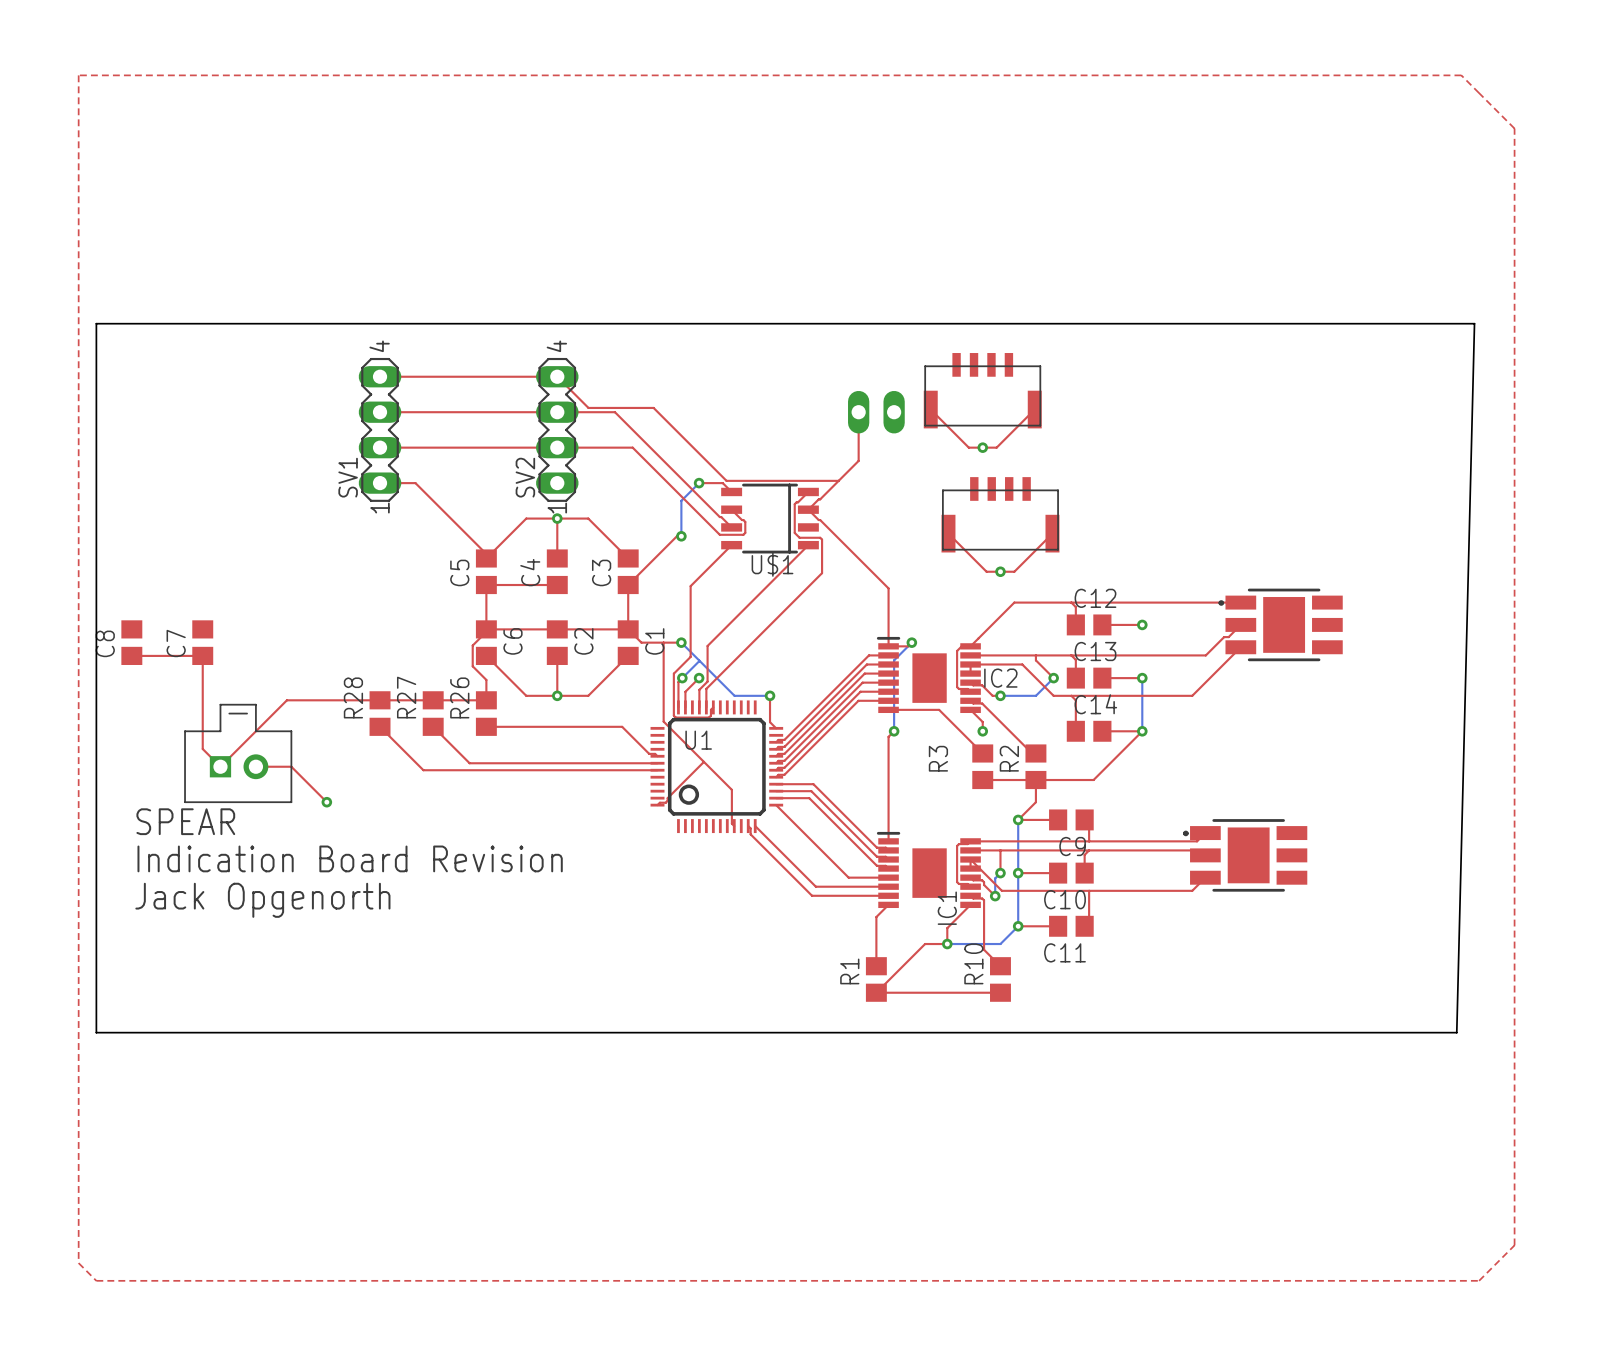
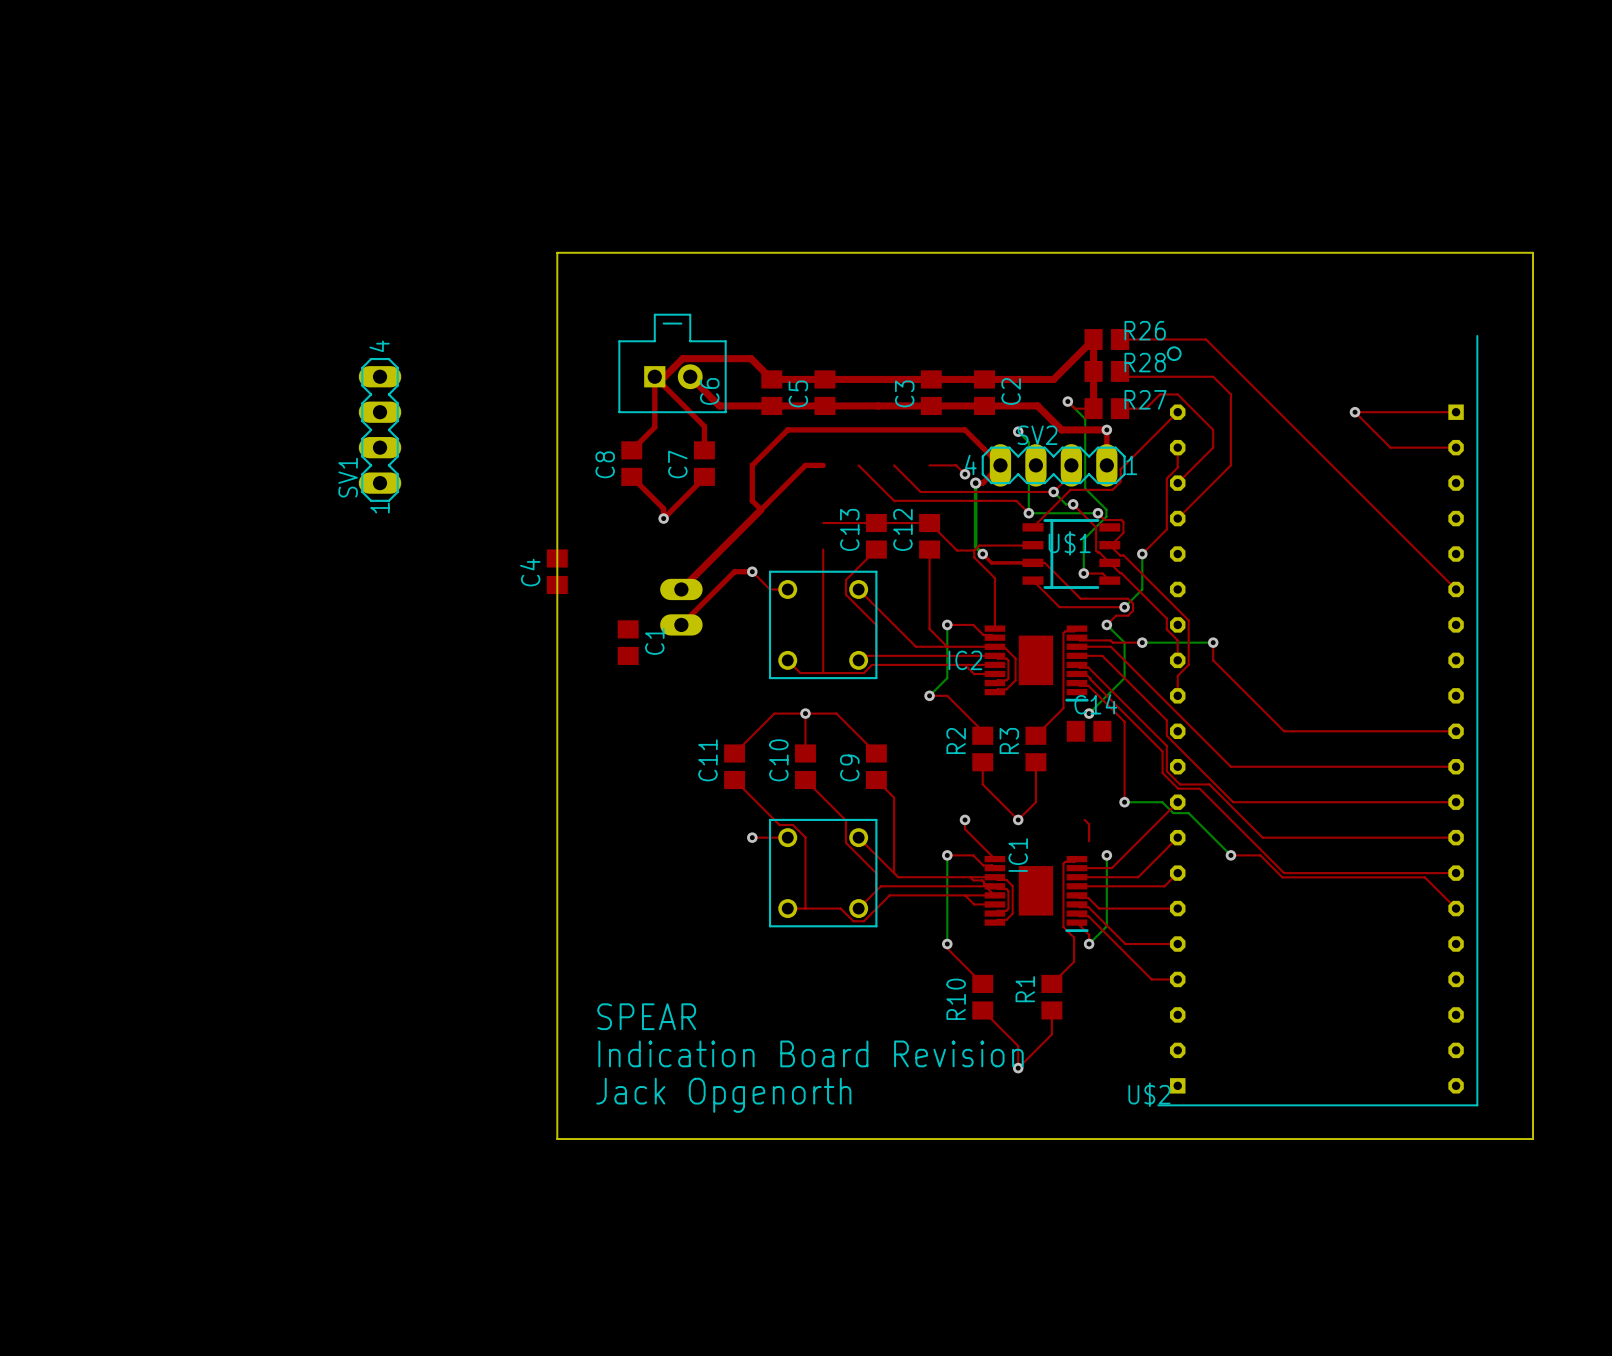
top zone outline: (78, 75) (78, 1263) (96, 1280) (1479, 1280) (1514, 1245) (1514, 128) (1461, 75) (78, 75) -> none
board edge: (96, 323) (1474, 323) (1456, 1032) (96, 1032) (96, 323) -> (557, 252) (557, 1139) (1533, 1139) (1533, 252) (557, 252)
top track: none -> (1120, 339) (1206, 339) (1456, 589)
SV2 footprint: [536, 357, 579, 502] -> [981, 444, 1126, 487]
part: none -> (672, 363)
top track: none -> (1120, 371) (1125, 376) (1213, 376) (1230, 394) (1230, 465) (1177, 518)
top track: (380, 376) (557, 376) (588, 407) (653, 407) (726, 480) (838, 480) -> none
top track: none -> (654, 376) (664, 376) (682, 358) (751, 358) (771, 379) (1053, 379) (1093, 339) (1093, 408) (1074, 408) (1067, 401)
top track: none -> (654, 376) (654, 427) (631, 450)
top track: none -> (654, 376) (704, 426) (704, 450)
top track: none -> (690, 376) (719, 405) (1037, 405) (1061, 429) (1106, 429) (1106, 465)
part: (982, 390) -> none
bottom track: none -> (1067, 401) (1085, 418) (1085, 488) (1106, 509) (1106, 516) (1083, 539) (1083, 573)
via: none -> (1067, 401)
top track: none -> (1120, 408) (1145, 408) (1160, 394) (1177, 394) (1213, 429) (1213, 447) (1177, 483)
top track: (930, 409) (968, 447) (996, 447) (1034, 409) -> none
top track: (380, 412) (614, 412) (731, 527) -> none
top track: (858, 412) (858, 460) (808, 509) (888, 588) (888, 646) (908, 646) (911, 642) -> none
part rotation: 0° (876, 412) -> 90° clockwise (681, 607)
part position: (876, 412) -> (681, 607)
top track: none -> (1177, 412) (1120, 469) (1120, 481) (1112, 489) (1070, 489) (1033, 527)
via: none -> (1355, 412)
top track: none -> (1456, 412) (1355, 412) (1390, 447) (1456, 447)
via: none -> (1106, 429)
bottom track: none -> (1018, 431) (1028, 442) (1028, 513) (1097, 513)
via: none -> (1018, 431)
top track: (380, 447) (632, 447) (719, 534) (743, 534) (745, 532) (745, 521) (731, 509) -> none
via: (982, 447) -> none
top track: none -> (1177, 447) (1177, 467) (1166, 478) (1166, 529) (1142, 554)
top track: none -> (823, 465) (805, 465) (761, 509)
top track: none -> (858, 465) (894, 500) (1016, 500) (1028, 513)
top track: none -> (894, 465) (920, 491) (1053, 491) (1071, 474) (1071, 465)
top track: none -> (929, 465) (956, 465) (965, 474)
via: none -> (965, 474)
top track: none -> (631, 476) (663, 508) (663, 518) (704, 477)
SV2 name position: SV2 (525, 477) -> SV2 (1037, 435)
top track: (380, 483) (415, 483) (488, 556) -> none
top track: (699, 483) (722, 483) (731, 491) -> none
bottom track: (699, 483) (681, 500) (681, 536) -> none
via: (699, 483) -> none
top track: none -> (975, 483) (982, 483) (1000, 465) (965, 429) (787, 429) (752, 465) (752, 500) (761, 509)
bottom track: none -> (975, 483) (975, 546) (982, 554)
via: none -> (975, 483)
top track: (808, 491) (794, 504) (794, 532) (799, 537) (820, 537) (822, 539) (822, 573) (706, 688) (706, 707) -> none
bottom track: none -> (1053, 491) (1066, 504) (1073, 504)
via: none -> (1053, 491)
top track: none -> (1073, 504) (1096, 527) (1096, 550) (1166, 618) (1166, 629) (1177, 640) (1177, 660)
via: none -> (1073, 504)
top track: none -> (761, 509) (681, 589)
via: none -> (1028, 513)
top track: none -> (1097, 513) (1104, 520) (1121, 520) (1123, 521) (1123, 532) (1112, 543) (1112, 548)
via: none -> (1097, 513)
part: (1000, 514) -> none
top track: (557, 518) (557, 558) -> (805, 713) (805, 753)
via: (557, 518) -> none
via: none -> (663, 518)
U$1 rotation: 0° (770, 518) -> 180° (1071, 554)
U$1 position: (770, 518) -> (1071, 554)
top track: none -> (823, 523) (929, 523) (957, 550) (974, 550)
top track: (948, 533) (986, 571) (1014, 571) (1052, 533) -> none
top track: (681, 536) (676, 536) (628, 585) (628, 629) -> none
via: (681, 536) -> none
top track: (731, 545) (690, 586) (690, 656) (673, 673) (673, 715) (675, 717) (709, 717) (713, 707) -> none
top track: (808, 545) (707, 645) (707, 681) (699, 689) (699, 707) -> none
top track: none -> (1033, 545) (979, 545) (974, 550)
top track: none -> (1109, 545) (1120, 555) (1123, 555) (1188, 620) (1188, 664) (1177, 675) (1177, 695)
top track: none -> (823, 549) (823, 673)
top track: none -> (876, 549) (845, 579) (845, 594) (876, 625) (876, 655)
top track: none -> (929, 549) (929, 629) (947, 646)
top track: none -> (974, 550) (974, 557) (994, 578) (994, 628)
top track: none -> (982, 554) (991, 562) (1044, 562) (1080, 598) (1128, 598) (1133, 603) (1133, 610) (1128, 615) (1116, 615) (1106, 624)
bottom track: none -> (1142, 554) (1142, 589) (1124, 607)
via: none -> (1142, 554)
top track: (486, 558) (526, 518) (588, 518) (628, 558) -> (734, 753) (774, 713) (836, 713) (876, 753)
U$1 name position: U$1 (772, 564) -> U$1 (1069, 543)
C5 position: (486, 571) -> (824, 392)
C3 position: (628, 571) -> (931, 392)
via: none -> (752, 571)
via position: (1000, 571) -> (982, 554)
top track: none -> (1083, 573) (1102, 573) (1109, 580)
via: none -> (1083, 573)
top track: none -> (1033, 580) (1059, 607) (1124, 607)
top track: (557, 585) (486, 585) (486, 631) (472, 645) (472, 666) (486, 679) (486, 700) (286, 700) (220, 766) (202, 749) (202, 655) (131, 655) -> none
top track: none -> (787, 589) (770, 589) (752, 571) (734, 571) (681, 624)
top track: none -> (858, 589) (915, 646) (1003, 646) (1015, 658) (1015, 680) (1006, 689) (997, 689) (994, 692)
C12 name position: C12 (1095, 598) -> C12 (902, 529)
top track: (1071, 602) (1075, 607) (1075, 624) -> none
top track: (1240, 602) (1014, 602) (970, 646) (961, 646) (957, 650) (957, 687) (958, 688) (967, 688) (970, 691) -> none
via: none -> (1124, 607)
part: none -> (823, 624)
top track: none -> (947, 624) (973, 624) (983, 634) (992, 634) (994, 637)
bottom track: none -> (947, 624) (947, 678) (929, 695)
via: none -> (947, 624)
C12 rotation: 0° (1089, 624) -> 90° clockwise (929, 536)
C12 position: (1089, 624) -> (929, 536)
top track: (1102, 624) (1142, 624) -> none
bottom track: none -> (1106, 624) (1124, 642) (1124, 678) (1089, 713)
via: none -> (1106, 624)
via: (1142, 624) -> none
top track: (1240, 624) (1228, 637) (1224, 637) (1205, 655) (970, 655) -> none
part: (1280, 624) -> none
top track: none -> (1076, 628) (1074, 631) (1065, 631) (1063, 633) (1063, 708) (1035, 735)
top track: (486, 629) (628, 629) -> none
top track: (628, 629) (641, 642) (681, 642) -> none
top track: none -> (1076, 637) (1079, 640) (1142, 642)
C6 name position: C6 (512, 641) -> C6 (709, 391)
C8 position: (131, 642) -> (631, 463)
C7 position: (202, 642) -> (704, 463)
C6 position: (486, 642) -> (771, 392)
C2 position: (557, 642) -> (984, 392)
top track: (663, 642) (663, 721) (731, 789) (731, 823) (734, 826) -> none
bottom track: (681, 642) (734, 695) (770, 695) -> none
via: (681, 642) -> none
bottom track: (911, 642) (894, 660) (894, 731) -> none
via: (911, 642) -> none
bottom track: none -> (1142, 642) (1213, 642)
via: none -> (1142, 642)
top track: none -> (1213, 642) (1213, 660) (1284, 731) (1456, 731)
via: none -> (1213, 642)
top track: none -> (1076, 646) (1110, 646) (1230, 766) (1456, 766)
top track: (1240, 647) (1192, 695) (1053, 695) (1022, 664) (970, 664) (970, 673) -> none
C13 name position: C13 (1095, 651) -> C13 (849, 529)
top track: (486, 655) (526, 695) (588, 695) (628, 655) -> none
top track: (557, 655) (557, 695) -> none
top track: (888, 655) (868, 655) (784, 739) (778, 739) (776, 742) -> none
top track: (1035, 655) (1035, 660) (1053, 678) -> none
top track: (1071, 655) (1075, 659) (1075, 678) -> none
top track: none -> (1076, 655) (1102, 655) (1166, 720) (1166, 735) (1233, 802) (1456, 802)
bottom track: (699, 660) (682, 678) -> none
top track: none -> (787, 660) (800, 673) (863, 673) (872, 664) (994, 664)
top track: none -> (858, 660) (863, 655) (994, 655) (997, 658) (1006, 658) (1008, 660) (1008, 678) (1006, 680) (997, 680) (994, 683)
top track: (888, 664) (866, 664) (784, 746) (778, 746) (776, 749) -> none
top track: none -> (965, 664) (974, 673) (994, 673)
top track: none -> (1076, 664) (1079, 667) (1088, 667) (1166, 745) (1166, 771) (1180, 784) (1209, 784) (1262, 837) (1456, 837)
top track: (888, 673) (864, 673) (784, 753) (778, 753) (776, 756) -> none
top track: none -> (1076, 673) (1085, 673) (1162, 751) (1162, 773) (1178, 788) (1199, 788) (1284, 873) (1456, 873)
IC2 rotation: 0° (928, 674) -> 180° (1036, 663)
IC2 position: (928, 674) -> (1036, 663)
top track: (682, 678) (678, 681) (678, 707) -> none
via: (682, 678) -> none
top track: (699, 678) (685, 691) (685, 707) -> none
via: (699, 678) -> none
bottom track: (1053, 678) (1035, 695) (1000, 695) -> none
via: (1053, 678) -> none
C13 rotation: 0° (1089, 678) -> 90° clockwise (876, 536)
C13 position: (1089, 678) -> (876, 536)
top track: (1102, 678) (1142, 678) -> none
bottom track: (1142, 678) (1142, 731) -> none
via: (1142, 678) -> none
top track: (888, 682) (862, 682) (784, 760) (778, 760) (776, 763) -> none
top track: (970, 682) (973, 685) (982, 685) (992, 695) (1000, 695) -> none
top track: none -> (1076, 683) (1079, 685) (1088, 685) (1124, 721) (1124, 802)
top track: (888, 691) (860, 691) (784, 767) (778, 767) (776, 770) -> none
via: (557, 695) -> none
top track: (770, 695) (770, 722) (776, 728) -> none
via position: (770, 695) -> (805, 713)
top track: none -> (929, 695) (947, 695) (982, 731) (982, 735)
via: none -> (929, 695)
via: (1000, 695) -> none
top track: (1071, 695) (1075, 700) (1075, 731) -> none
top track: (888, 700) (858, 700) (784, 774) (778, 774) (776, 777) -> none
top track: (970, 700) (973, 703) (982, 703) (1032, 753) (1035, 753) -> none
top track: (888, 709) (939, 709) (982, 753) -> none
top track: (970, 709) (982, 722) (982, 731) -> (1076, 922) (1089, 934) (1089, 944)
R28 rotation: 0° (380, 713) -> 90° clockwise (1106, 371)
R28 position: (380, 713) -> (1106, 371)
R27 rotation: 0° (433, 713) -> 90° clockwise (1106, 408)
R27 position: (433, 713) -> (1106, 408)
R26 rotation: 0° (486, 713) -> 90° clockwise (1106, 339)
R26 position: (486, 713) -> (1106, 339)
via: none -> (1089, 713)
U$2: none -> (1317, 720)
top track: (380, 726) (423, 770) (657, 770) -> none
top track: (433, 726) (469, 763) (657, 763) -> none
top track: (486, 726) (622, 726) (649, 753) (655, 753) (657, 756) -> none
top track: (894, 731) (888, 736) (888, 841) -> none
via: (894, 731) -> none
via: (982, 731) -> none
top track: (1102, 731) (1142, 731) (1093, 780) (982, 780) -> none
via: (1142, 731) -> none
part: (238, 753) -> none
R3 name position: R3 (938, 758) -> R3 (1009, 740)
top track: (703, 761) (667, 798) (665, 802) (659, 802) (657, 805) -> none
top track: none -> (1035, 762) (1035, 780)
top track: (255, 766) (291, 766) (326, 802) -> none
U1: (716, 766) -> none
R3 position: (982, 766) -> (1035, 749)
R2 position: (1035, 766) -> (982, 749)
top track: none -> (734, 780) (779, 824) (792, 824) (805, 837) (805, 908)
top track: none -> (805, 780) (845, 820) (845, 842) (876, 873) (876, 890)
top track: none -> (876, 780) (894, 797) (894, 873)
top track: (776, 784) (813, 784) (876, 847) (885, 847) (888, 850) -> none
top track: (776, 791) (811, 791) (876, 856) (885, 856) (888, 859) -> none
top track: (776, 798) (809, 798) (876, 865) (885, 865) (888, 868) -> none
via: (326, 802) -> none
bottom track: none -> (1124, 802) (1162, 802) (1173, 813) (1188, 813) (1230, 855)
via: none -> (1124, 802)
top track: none -> (1177, 802) (1111, 868) (1076, 868)
top track: (776, 805) (848, 877) (888, 877) -> none
top track: none -> (965, 819) (965, 829) (994, 859)
via: none -> (965, 819)
top track: (1018, 819) (1058, 819) -> (1018, 819) (982, 784) (982, 762)
bottom track: (1018, 819) (1018, 926) (1000, 944) (947, 944) -> (947, 855) (947, 944)
C9 rotation: 0° (1071, 819) -> 90° clockwise (876, 766)
C9 position: (1071, 819) -> (876, 766)
text: SPEAR (185, 821) -> none
top track: (748, 826) (750, 828) (750, 834) (812, 895) (888, 895) -> none
top track: (755, 826) (815, 886) (888, 886) -> none
top track: (1205, 833) (1197, 841) (970, 841) (967, 844) (958, 844) (957, 845) (957, 882) (958, 883) (967, 883) (970, 886) -> none
top track: none -> (752, 837) (787, 837)
via: none -> (752, 837)
top track: none -> (858, 837) (898, 877) (994, 877) (997, 879) (1006, 879) (1012, 886) (1012, 913) (1006, 919) (997, 919) (994, 922)
top track: none -> (1177, 837) (1138, 877) (1076, 877)
top track: (970, 850) (1200, 850) (1205, 855) -> none
top track: (1000, 850) (1000, 873) -> none
top track: (1089, 850) (1084, 854) (1084, 873) -> none
top track: none -> (947, 855) (973, 855) (983, 865) (992, 865) (994, 868)
via: none -> (947, 855)
bottom track: none -> (1106, 855) (1106, 926) (1089, 944)
via: none -> (1106, 855)
top track: none -> (1230, 855) (1260, 855) (1282, 877) (1424, 877) (1456, 908)
via: none -> (1230, 855)
part: (1245, 855) -> none
text: Indication Board Revision (350, 858) -> none
top track: none -> (1076, 859) (1074, 861) (1065, 861) (1063, 863) (1063, 927) (1074, 937) (1074, 961) (1051, 983)
top track: (970, 868) (970, 859) (1001, 890) (1192, 890) (1205, 877) -> none
IC1 rotation: 0° (928, 869) -> 180° (1036, 893)
IC1 position: (928, 869) -> (1036, 893)
part: none -> (823, 873)
bottom track: (1000, 873) (995, 878) (995, 896) -> none
via: (1000, 873) -> none
top track: (1018, 873) (1058, 873) -> none
via: (1018, 873) -> none
C10 rotation: 0° (1071, 873) -> 90° clockwise (805, 766)
C10 position: (1071, 873) -> (805, 766)
top track: none -> (1177, 873) (1164, 886) (1076, 886)
top track: (1089, 890) (1089, 921) (1084, 926) -> none
top track: none -> (965, 895) (974, 904) (994, 904)
top track: (970, 895) (973, 898) (982, 898) (984, 900) (984, 949) (1000, 966) -> none
top track: none -> (994, 895) (889, 895) (863, 921) (853, 921) (840, 908) (787, 908)
top track: none -> (1076, 895) (1079, 898) (1088, 898) (1099, 908) (1177, 908)
via: (995, 896) -> none
text: Jack Opgenorth (262, 900) -> none
top track: (888, 904) (876, 917) (876, 966) -> none
top track: (970, 904) (947, 928) (947, 944) (925, 944) (876, 992) (1000, 992) -> none
top track: none -> (1076, 904) (1079, 907) (1088, 907) (1125, 944) (1177, 944)
top track: none -> (858, 908) (880, 886) (994, 886) (997, 889) (1006, 889) (1008, 890) (1008, 908) (1006, 910) (997, 910) (994, 913)
top track: none -> (1076, 913) (1079, 916) (1088, 916) (1151, 979) (1177, 979)
top track: (1018, 926) (1058, 926) -> none
via: (1018, 926) -> none
C11 rotation: 0° (1071, 926) -> 90° clockwise (734, 766)
C11 position: (1071, 926) -> (734, 766)
top track: none -> (947, 944) (947, 948) (982, 983)
via: none -> (1089, 944)
R10 name position: R10 (973, 963) -> R10 (956, 999)
R1 position: (876, 979) -> (1051, 997)
R10 position: (1000, 979) -> (982, 997)
top track: none -> (982, 1010) (1018, 1045) (1018, 1068) (1051, 1034) (1051, 1010)
text: none -> SPEAR (646, 1016)
text: none -> Indication Board Revision (811, 1053)
via: none -> (1018, 1068)
text: none -> Jack Opgenorth (723, 1095)

